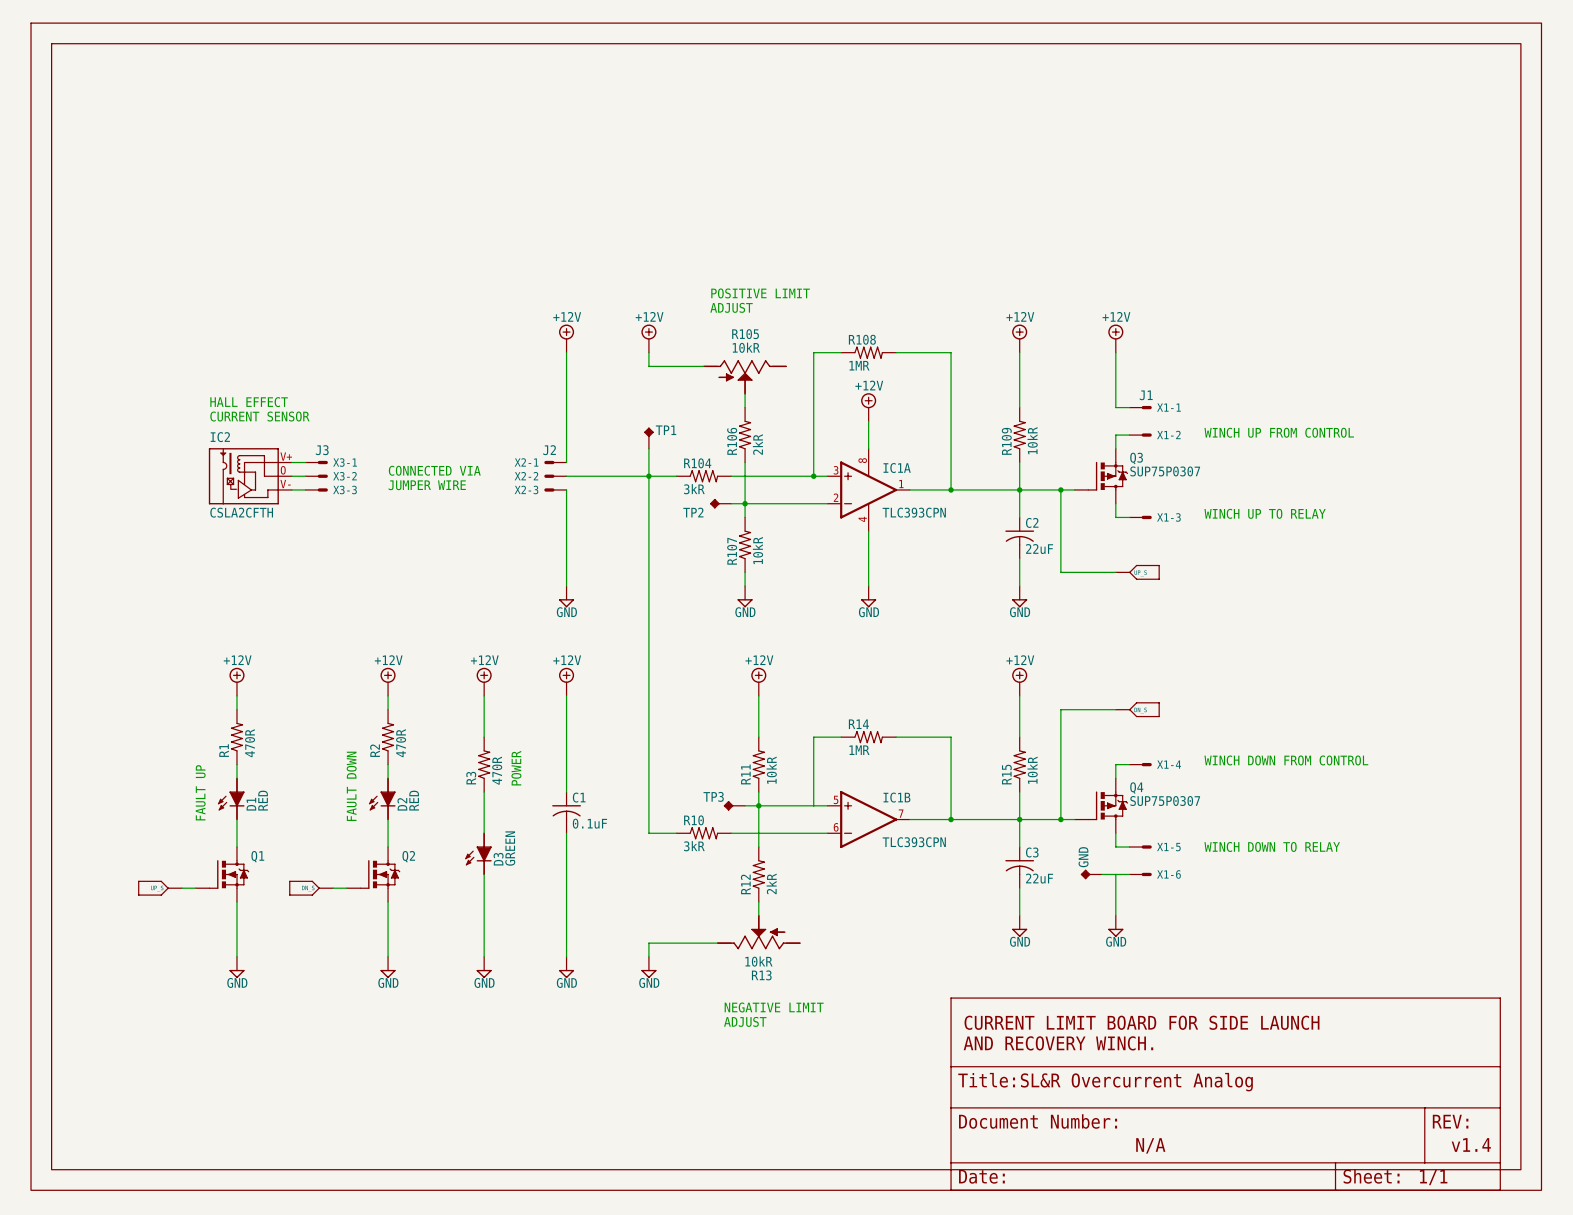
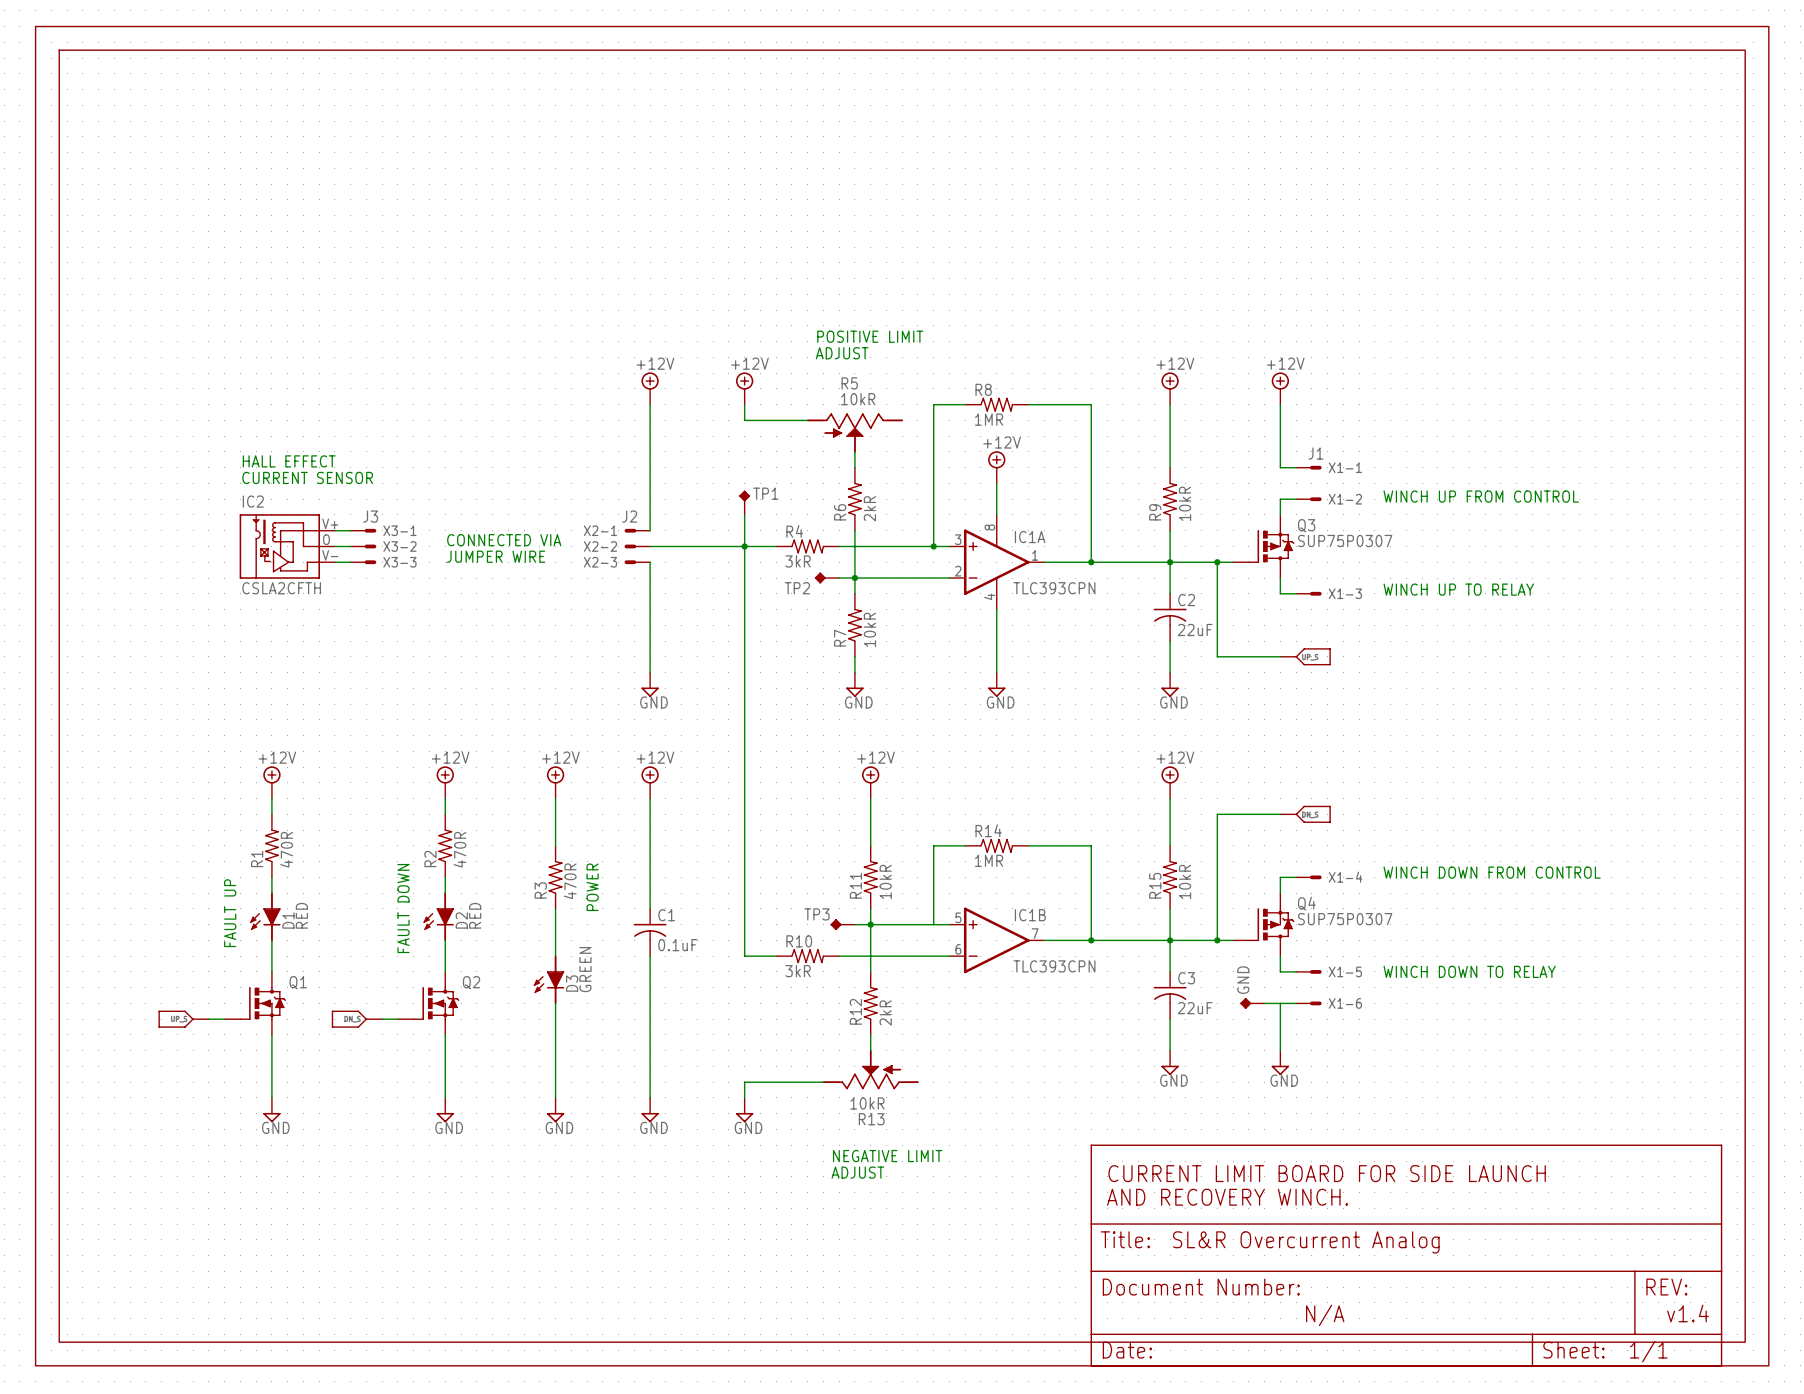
R105 name: R105 (745, 334) -> R5 (849, 383)
R108 name: R108 (862, 339) -> R8 (983, 389)
R106 name: R106 (732, 441) -> R6 (840, 512)
R109 name: R109 (1006, 441) -> R9 (1155, 512)
R104 name: R104 (697, 463) -> R4 (794, 531)
R107 name: R107 (732, 551) -> R7 (840, 638)

